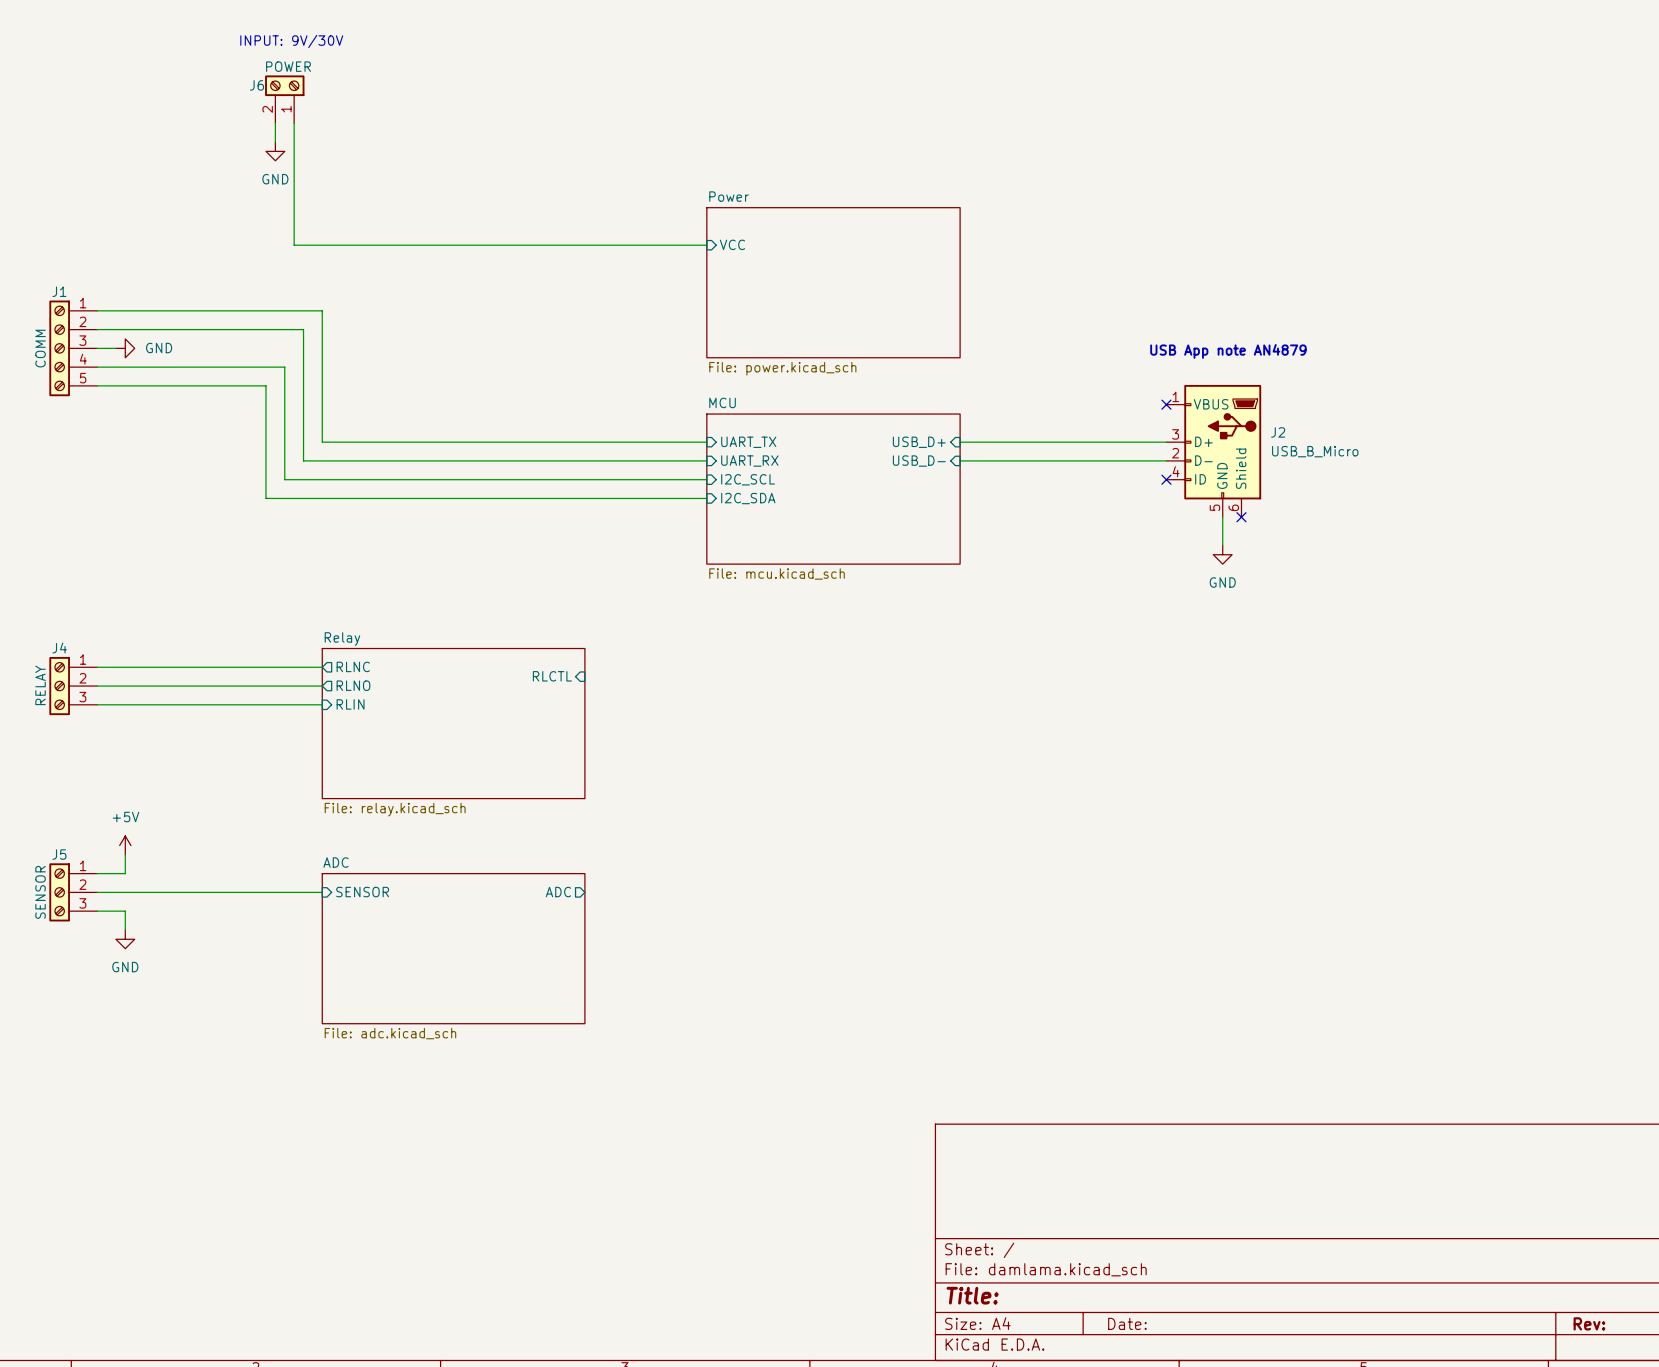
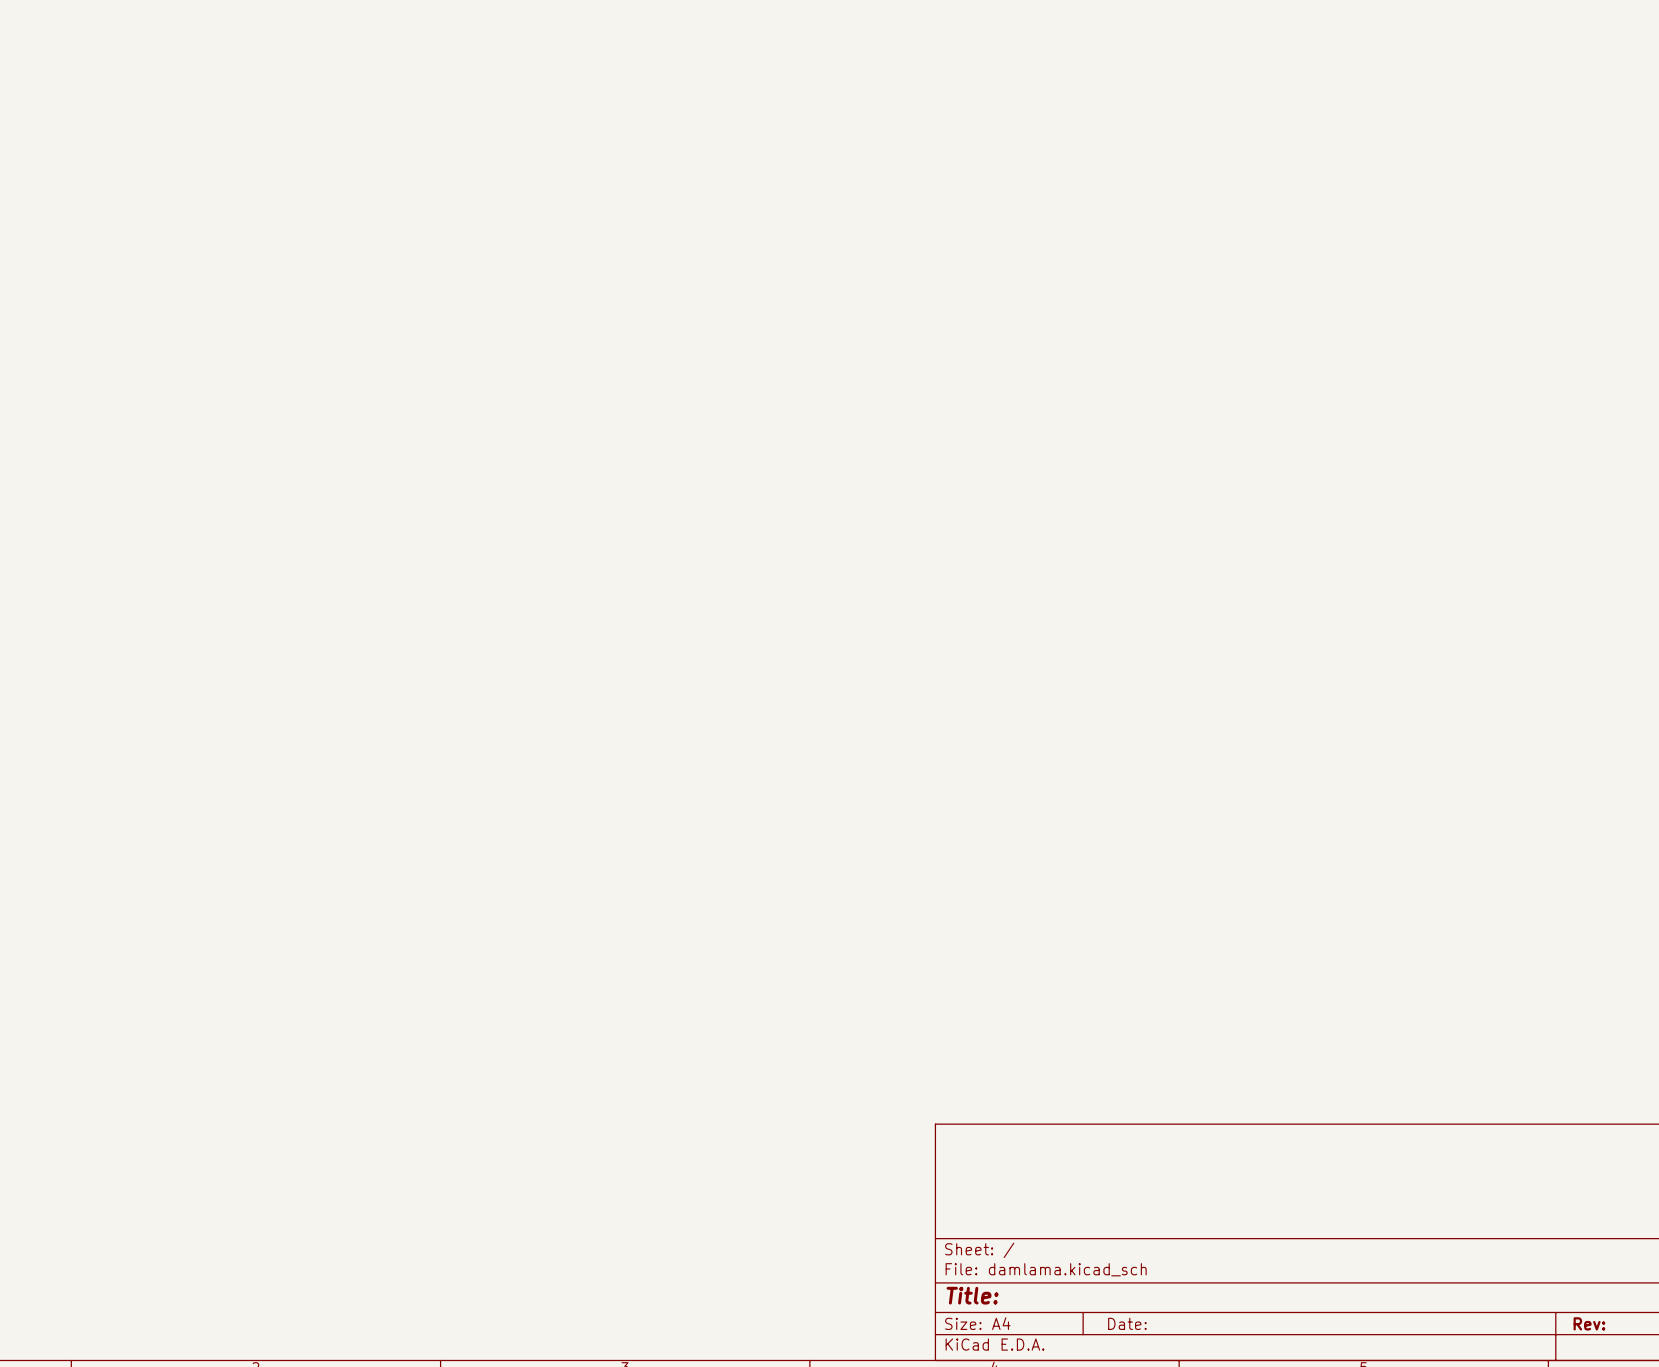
text: INPUT: 9V/30V (291, 41) -> none
J6: POWER (284, 99) -> none
wire: (275, 123) (275, 142) -> none
wire: (294, 123) (294, 245) (706, 245) -> none
power symbol: GND (275, 151) -> none
sheet pin: VCC (732, 244) -> none
sheet Power: File: power.kicad_sch (833, 282) -> none
wire: (97, 310) (322, 310) (322, 442) (706, 442) -> none
wire: (97, 329) (303, 329) (303, 460) (706, 460) -> none
J1: COMM (73, 348) -> none
wire: (97, 348) (115, 348) -> none
power symbol: GND (125, 348) -> none
text: USB App note AN4879 (1228, 351) -> none
wire: (97, 367) (284, 367) (284, 479) (706, 479) -> none
wire: (97, 385) (266, 385) (266, 498) (706, 498) -> none
no-connect mark: (1166, 404) -> none
sheet pin: UART_TX (748, 442) -> none
sheet pin: USB_D+ (919, 442) -> none
wire: (960, 442) (1166, 442) -> none
J2: USB_B_Micro (1213, 451) -> none
wire: (960, 460) (1166, 460) -> none
sheet pin: UART_RX (749, 461) -> none
sheet pin: USB_D- (919, 461) -> none
sheet pin: I2C_SCL (748, 479) -> none
no-connect mark: (1166, 479) -> none
sheet MCU: File: mcu.kicad_sch (833, 489) -> none
sheet pin: I2C_SDA (748, 498) -> none
wire: (1222, 517) (1222, 545) -> none
no-connect mark: (1241, 517) -> none
power symbol: GND (1222, 554) -> none
sheet pin: RLNC (353, 666) -> none
wire: (97, 667) (322, 667) -> none
sheet pin: RLCTL (552, 676) -> none
sheet pin: RLNO (353, 685) -> none
J4: RELAY (73, 686) -> none
wire: (97, 686) (322, 686) -> none
wire: (97, 704) (322, 704) -> none
sheet pin: RLIN (350, 704) -> none
sheet Relay: File: relay.kicad_sch (453, 723) -> none
power symbol: +5V (125, 845) -> none
wire: (125, 854) (125, 873) (97, 873) -> none
J5: SENSOR (73, 892) -> none
wire: (97, 892) (322, 892) -> none
sheet pin: SENSOR (362, 892) -> none
sheet pin: ADC (558, 892) -> none
wire: (97, 911) (125, 911) (125, 929) -> none
power symbol: GND (125, 939) -> none
sheet ADC: File: adc.kicad_sch (453, 948) -> none

